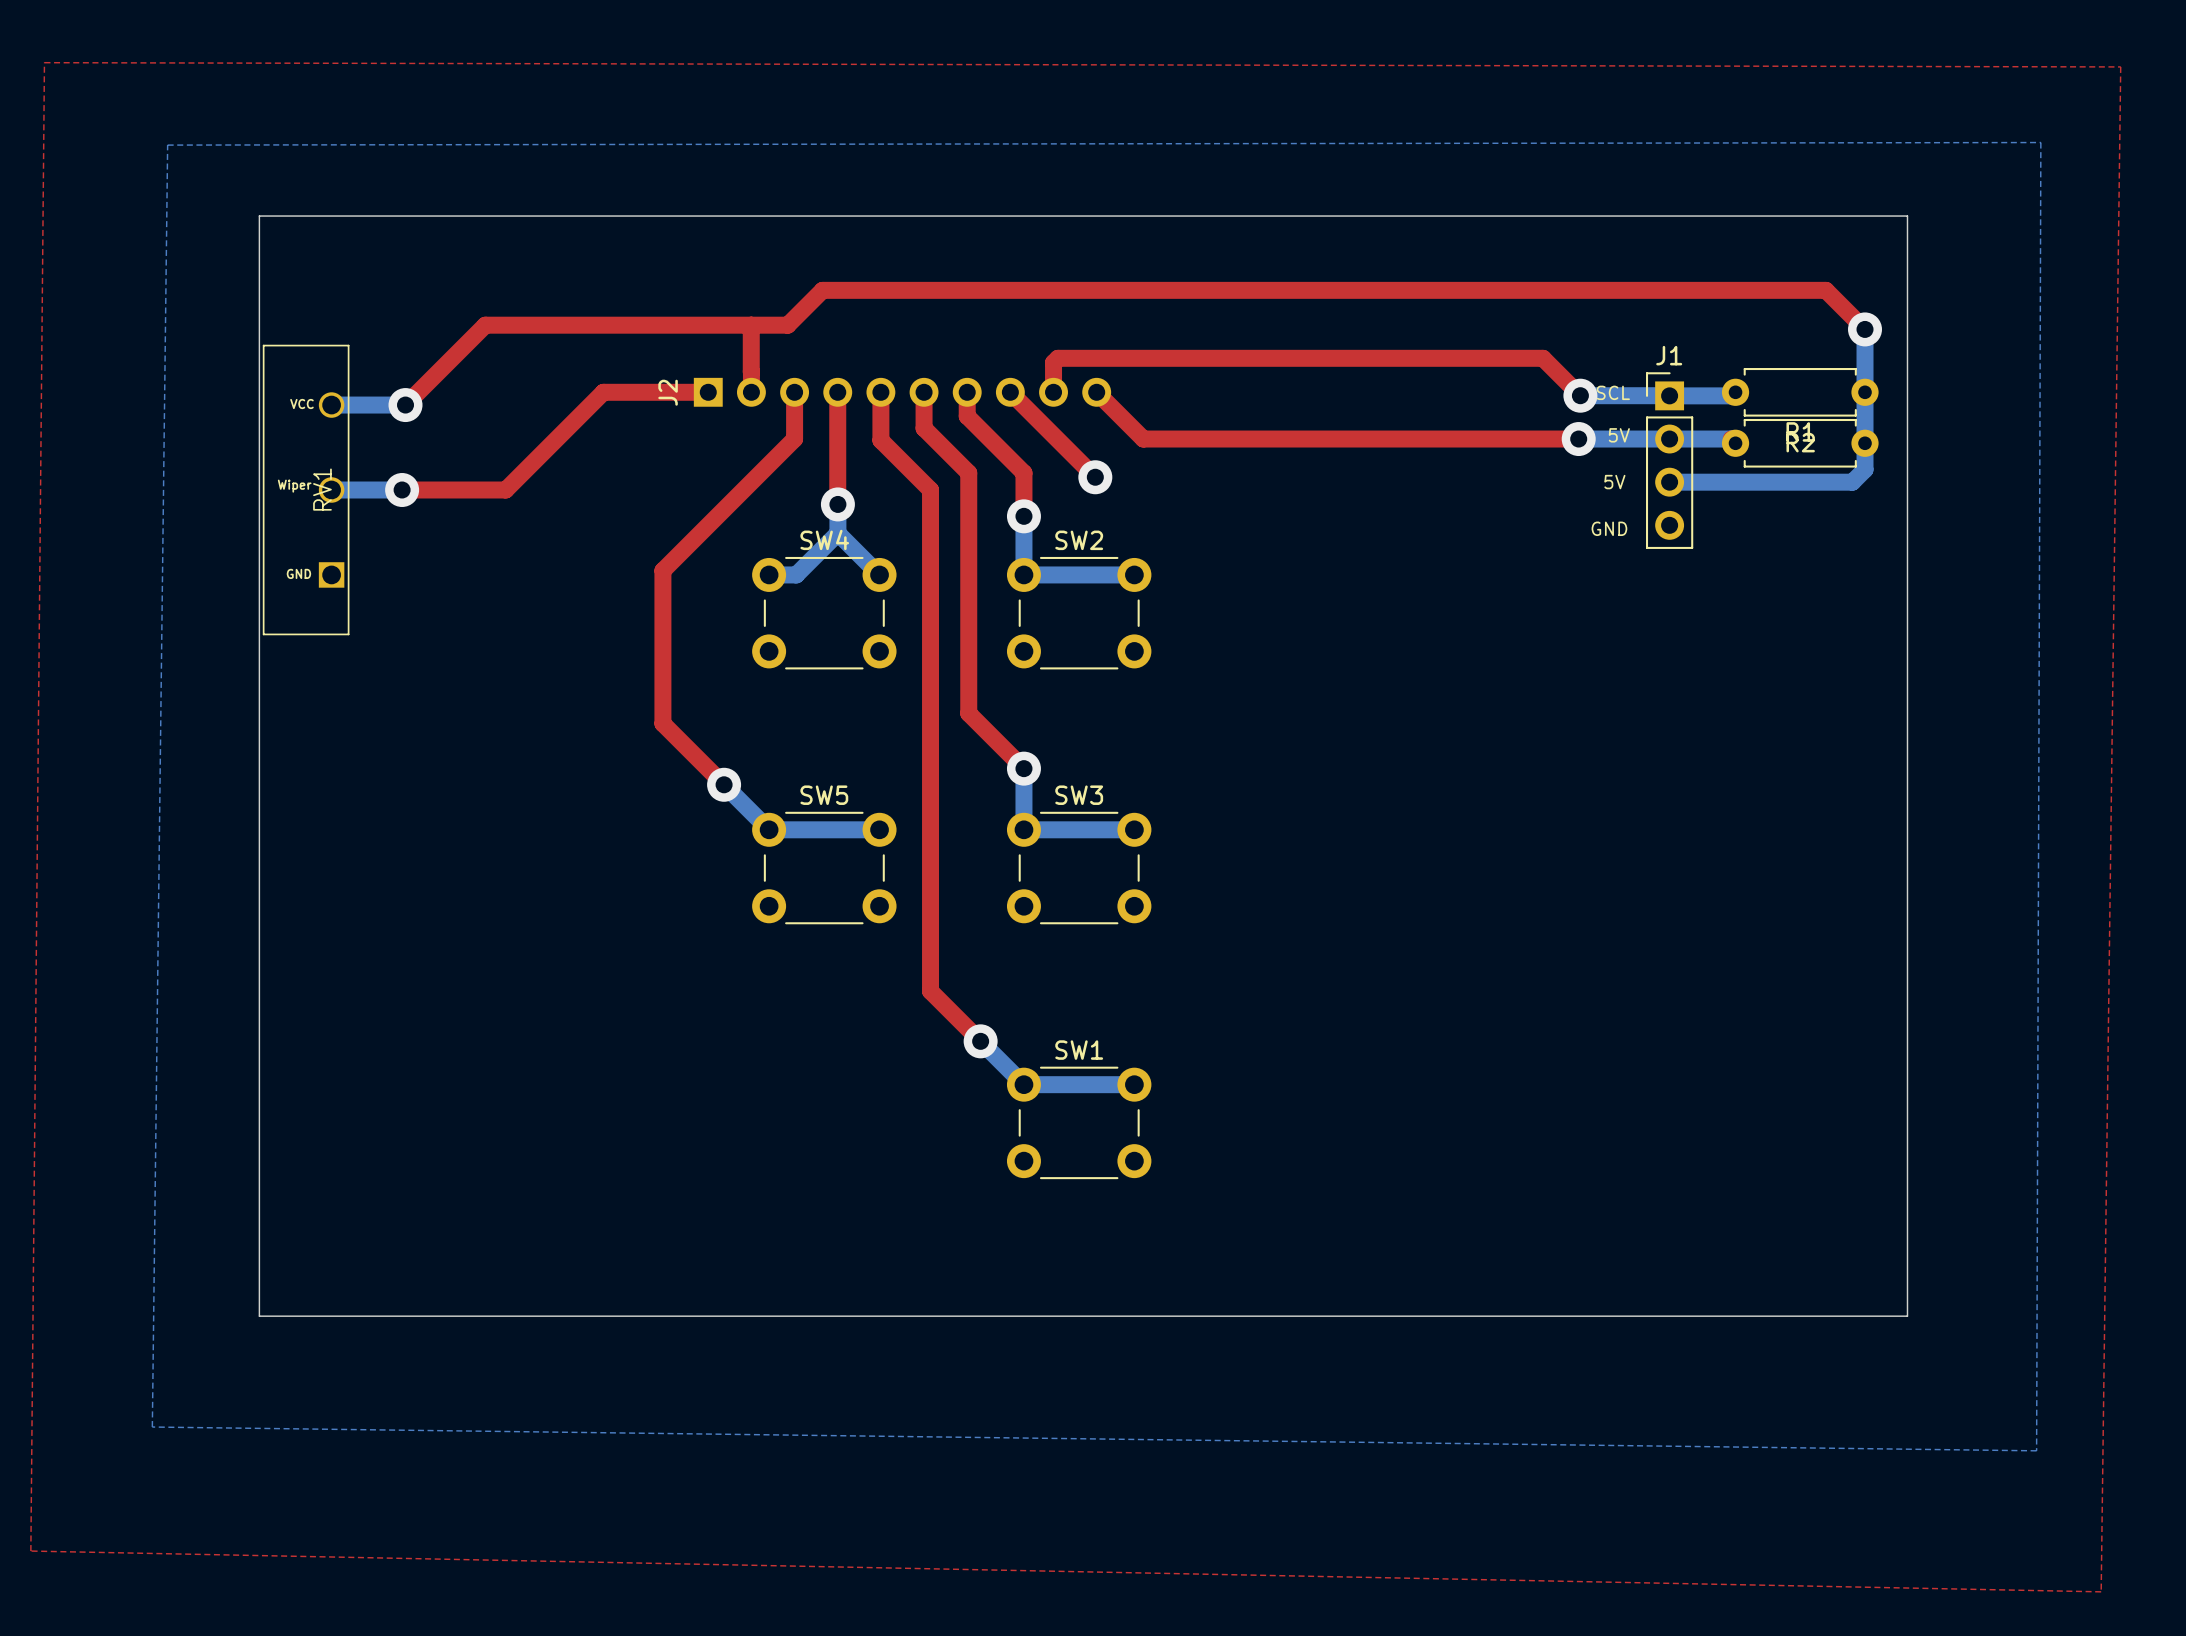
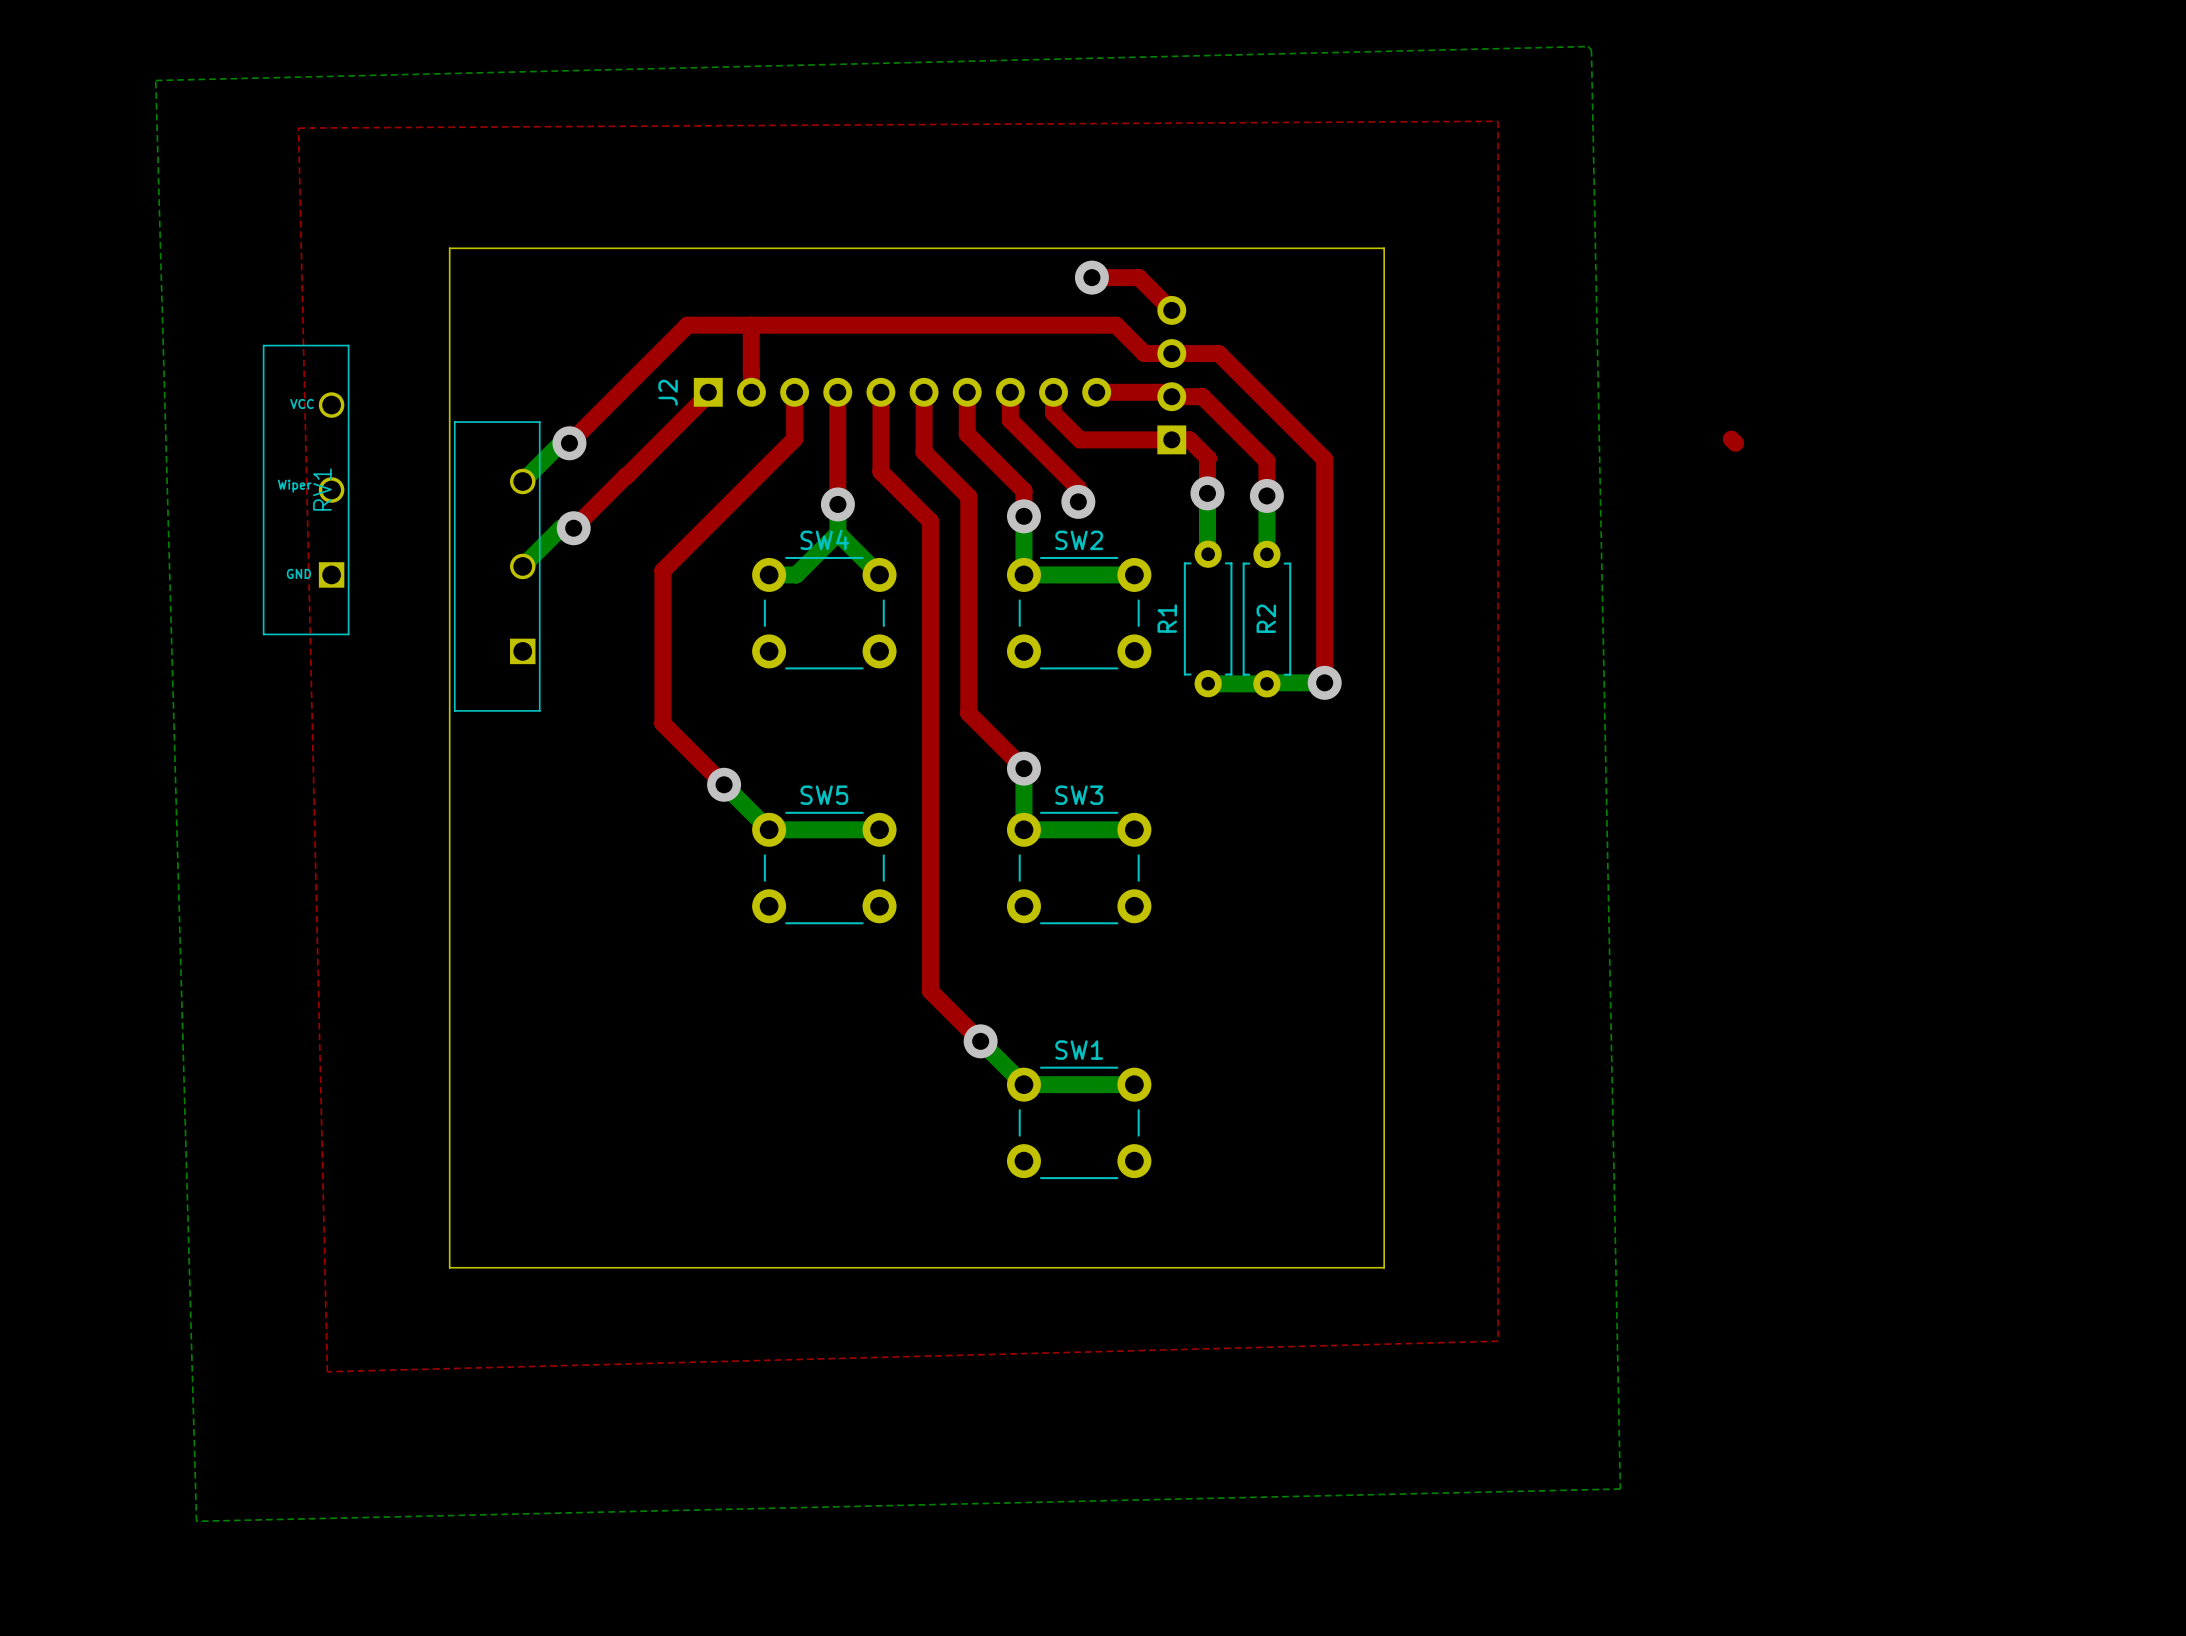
top zone outline: (44, 62) (2120, 66) (2101, 1591) (30, 1551) (44, 62) -> none
top zone outline: none -> (1498, 121) (298, 128) (327, 1371) (1498, 1341) (1498, 121)
bottom zone outline: (2040, 142) (167, 145) (152, 1427) (2036, 1450) (2040, 142) -> (1588, 46) (155, 80) (196, 1521) (1620, 1489) (1591, 49) (1588, 46)
board edge: (259, 216) (1907, 216) (1907, 1316) (259, 1316) (259, 216) -> (449, 248) (449, 1267) (1384, 1267) (1384, 248) (449, 248)
top track: none -> (1091, 277) (1138, 277) (1171, 310)
via: none -> (1091, 277)
top track: (687, 325) (485, 325) (405, 405) -> (687, 325) (569, 443)
top track: (787, 325) (822, 290) (1825, 290) (1865, 329) -> (787, 325) (1116, 325) (1144, 353) (1218, 353) (1324, 459) (1324, 682)
bottom track: (1865, 329) (1865, 469) (1852, 482) (1669, 482) -> none
via: (1865, 329) -> none
part: none -> (1171, 375)
top track: (708, 392) (603, 392) (505, 490) (402, 490) -> (708, 392) (708, 394) (573, 528)
top track: (1010, 392) (1095, 477) -> (1010, 392) (1010, 420) (1078, 488) (1078, 501)
top track: (1053, 392) (1053, 362) (1057, 358) (1543, 358) (1580, 395) -> (1053, 392) (1053, 413) (1080, 439) (1189, 439) (1208, 458) (1207, 493)
top track: (1096, 392) (1143, 439) (1578, 439) -> (1096, 392) (1167, 392) (1171, 396) (1202, 396) (1266, 461) (1266, 495)
text: SCL (1613, 392) -> none
bottom track: (1735, 392) (1731, 395) (1669, 395) -> none
R1 rotation: 0° (1800, 392) -> 90° clockwise (1208, 618)
R1 position: (1800, 392) -> (1208, 618)
bottom track: (1580, 395) (1669, 395) -> none
via: (1580, 395) -> none
bottom track: (331, 405) (405, 405) -> none
via: (405, 405) -> none
top track: (967, 416) (1023, 473) (1023, 490) -> (967, 416) (967, 434) (1023, 490)
top track: (924, 428) (968, 473) (968, 496) -> (924, 428) (924, 452) (968, 496)
text: 5V (1619, 435) -> none
bottom track: (1578, 439) (1731, 439) (1735, 443) -> none
via: (1578, 439) -> none
top track: (880, 440) (930, 490) (930, 521) -> (880, 440) (880, 471) (930, 521)
bottom track: none -> (569, 443) (560, 443) (522, 481)
via: none -> (569, 443)
R2 rotation: 0° (1800, 443) -> 90° clockwise (1266, 619)
R2 position: (1800, 443) -> (1266, 619)
J1: (1669, 460) -> none
via position: (1095, 477) -> (1078, 501)
text: 5V (1614, 482) -> none
bottom track: (331, 490) (402, 490) -> none
via: (402, 490) -> none
bottom track: none -> (1207, 493) (1208, 554)
via: none -> (1207, 493)
bottom track: none -> (1266, 495) (1266, 554)
via: none -> (1266, 495)
bottom track: none -> (573, 528) (560, 528) (522, 566)
via: none -> (573, 528)
text: GND (1609, 528) -> none
part: none -> (497, 566)
bottom track: none -> (1324, 682) (1208, 683)
via: none -> (1324, 682)

